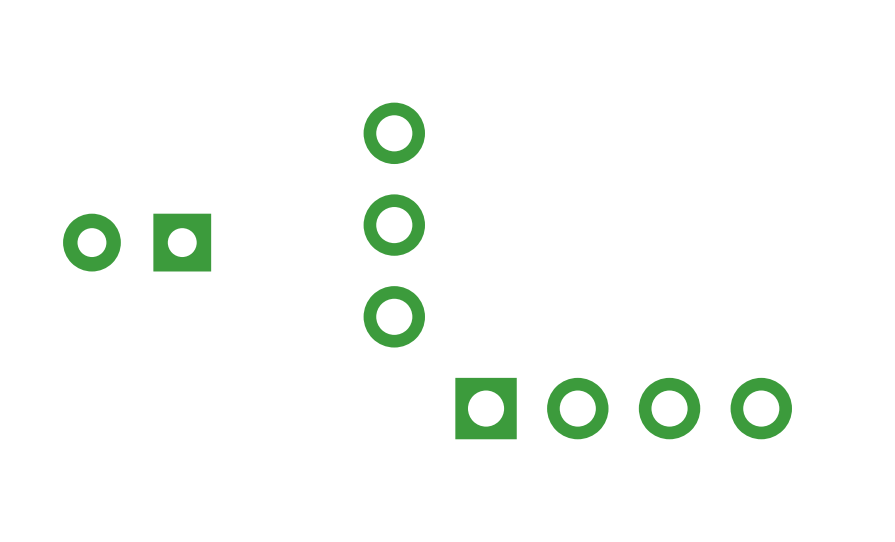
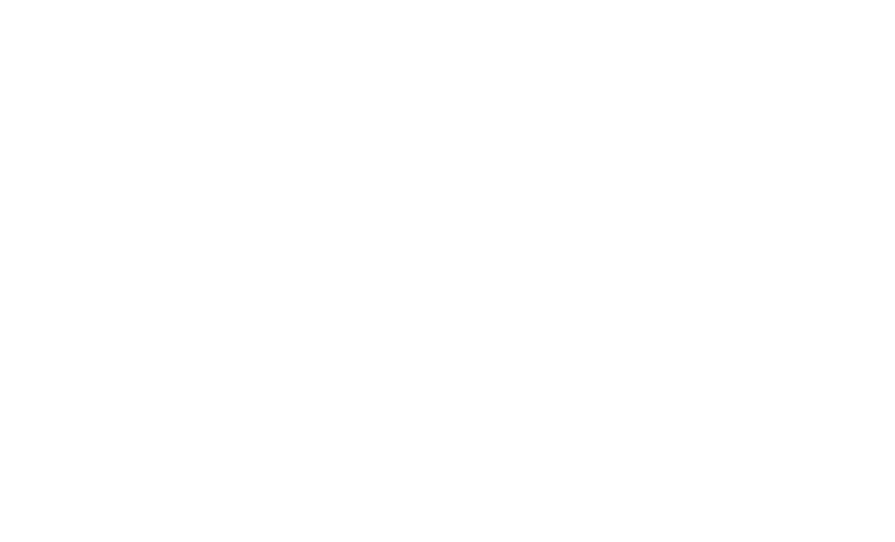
part: (137, 242) -> none
part: (577, 270) -> none

